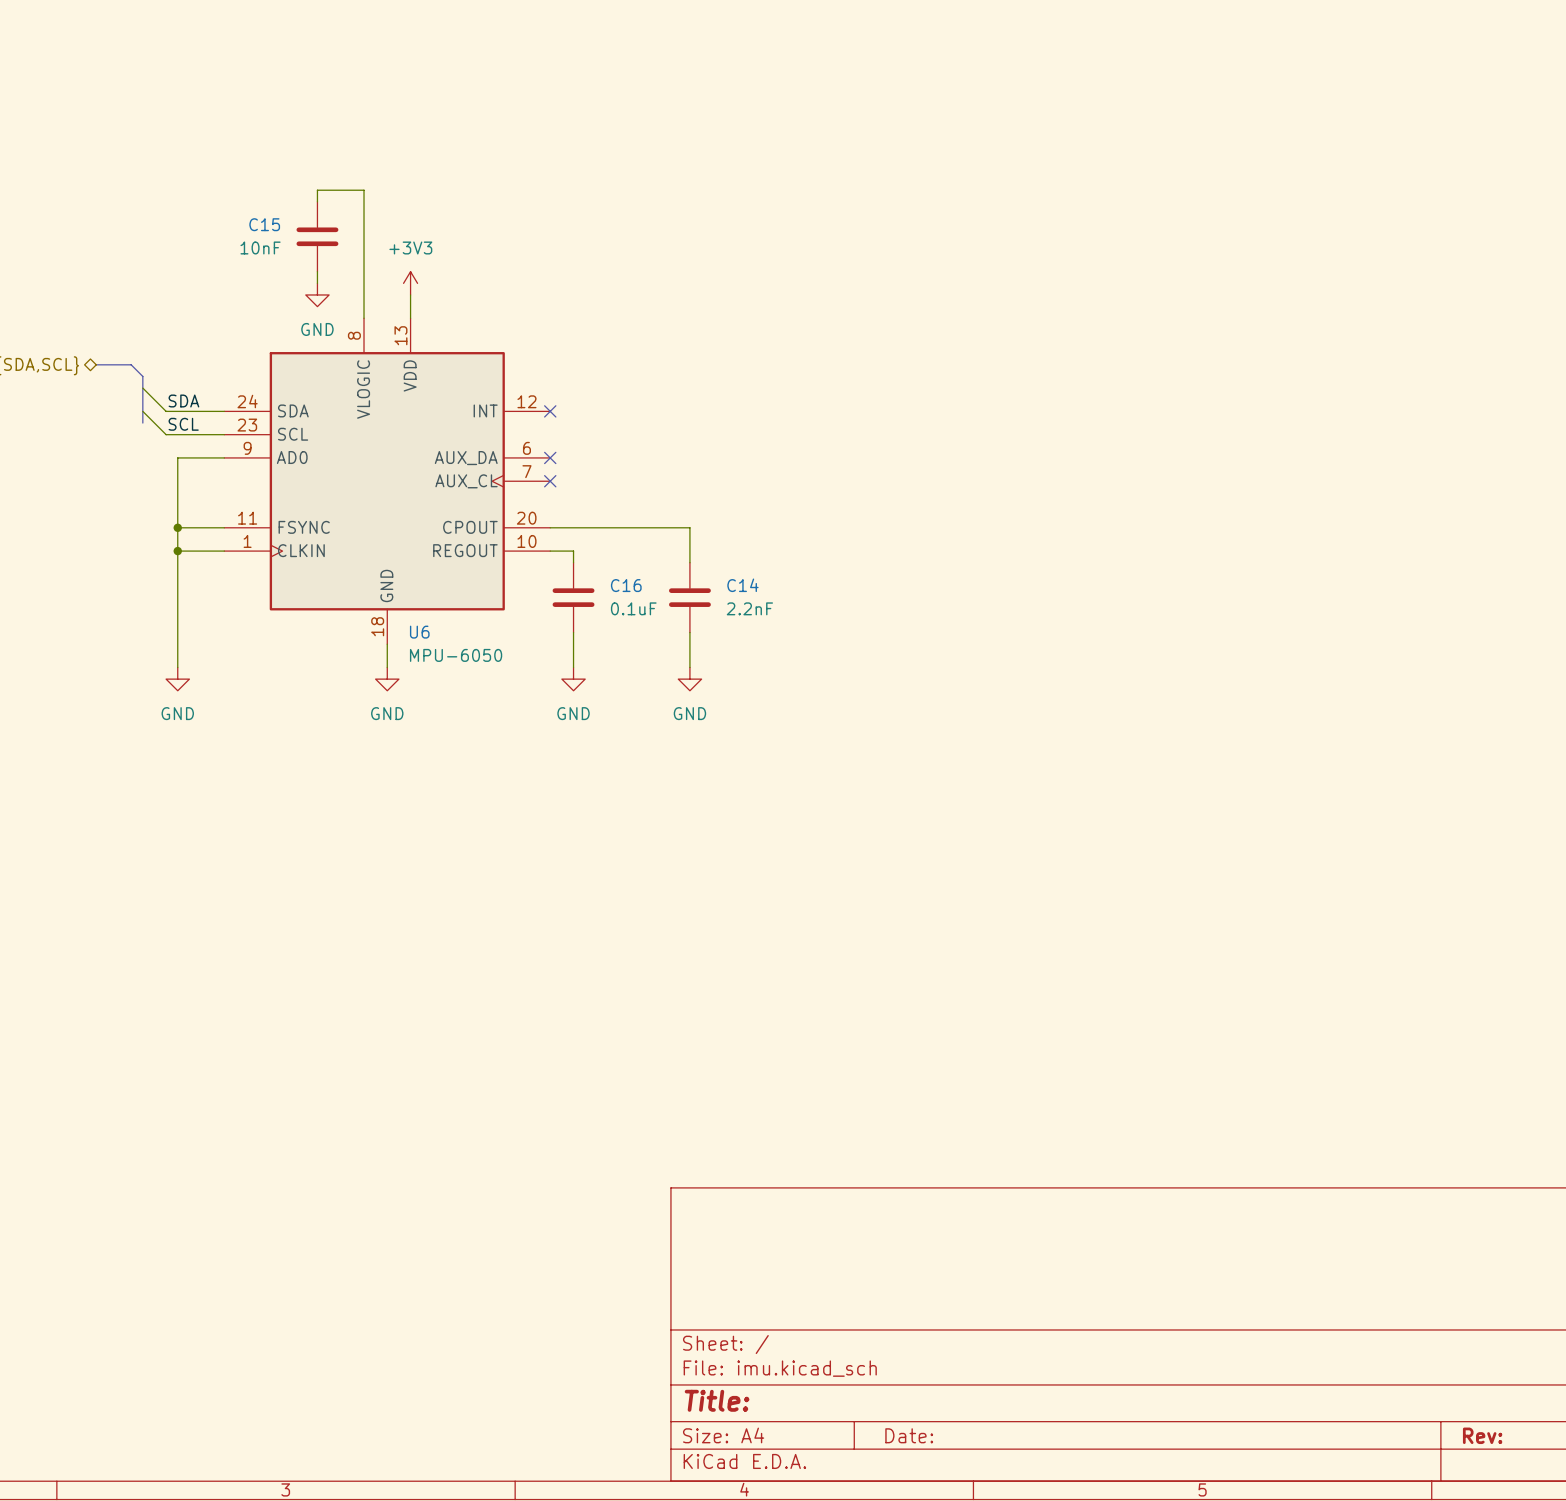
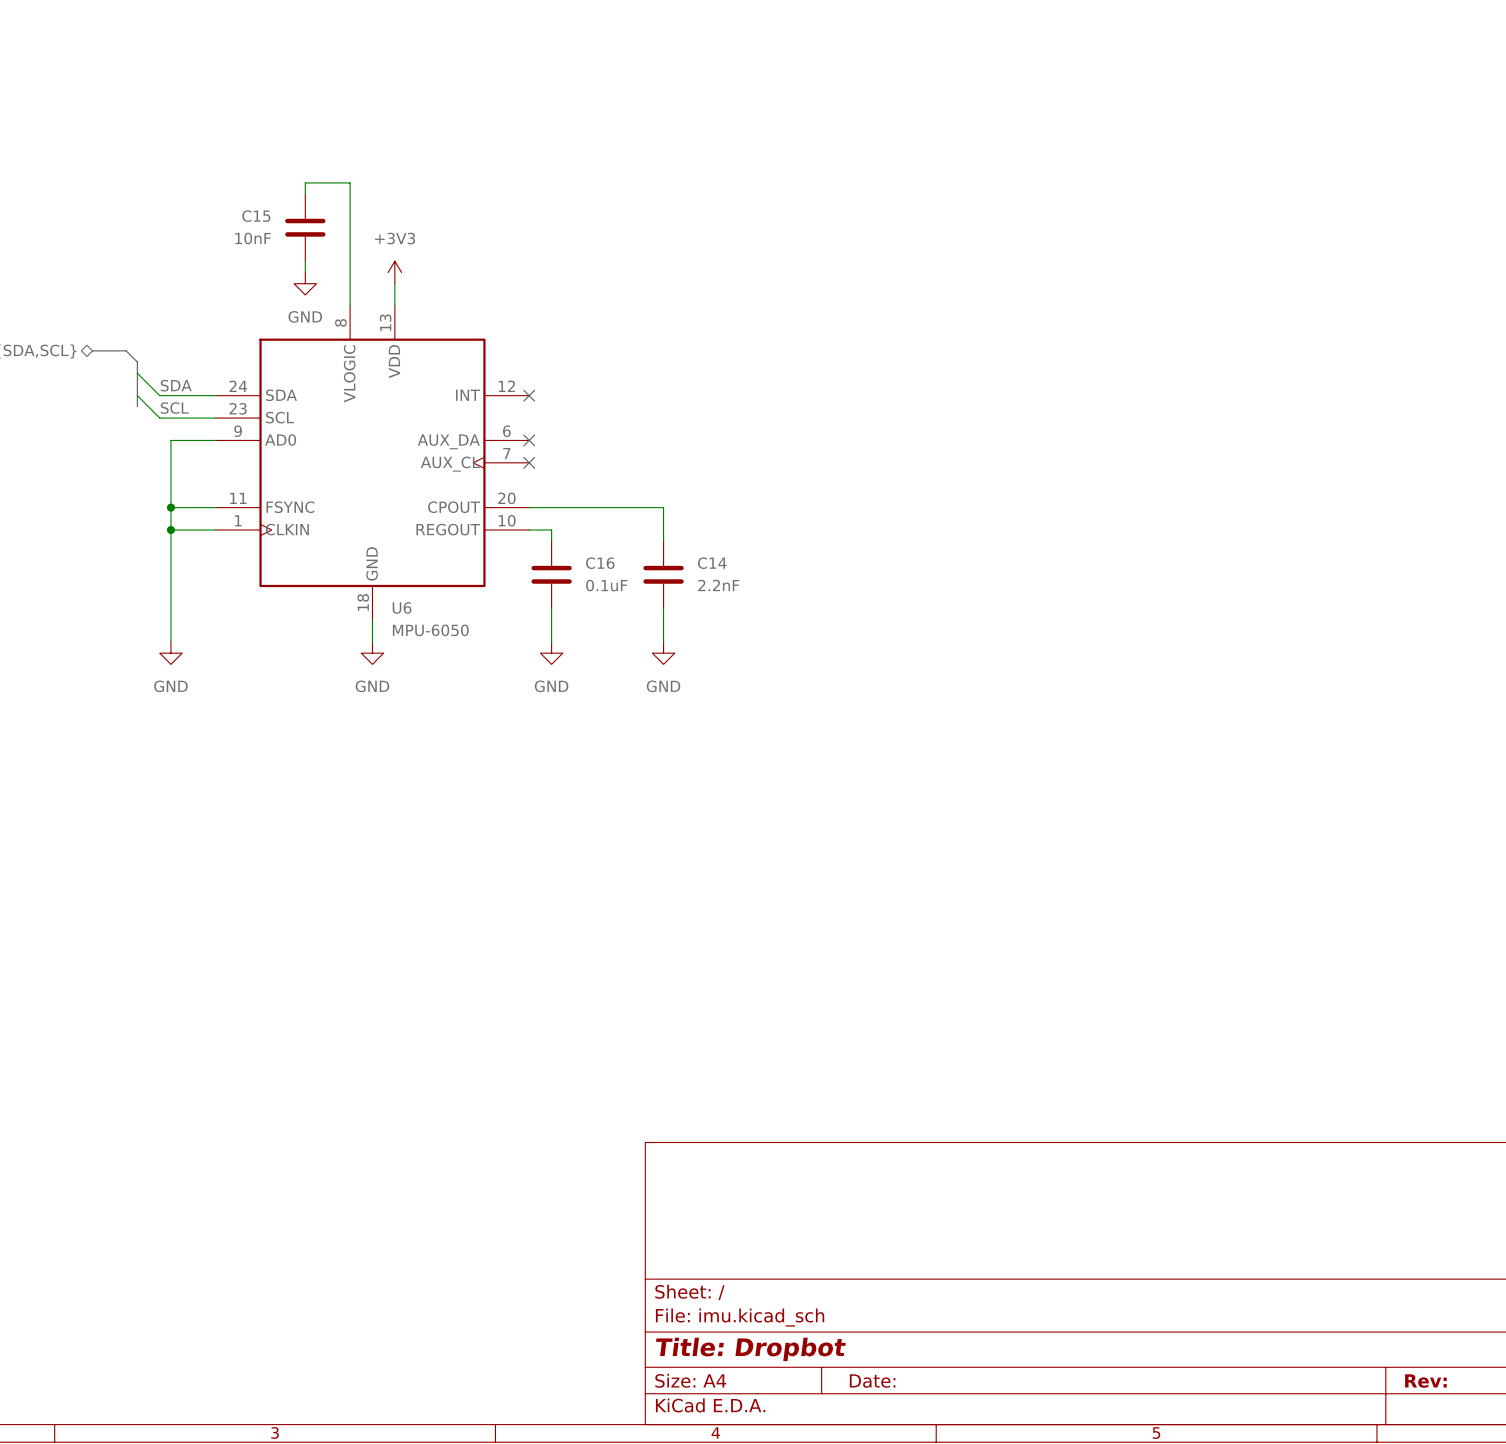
title block: Title: (717, 1400) -> Title: Dropbot (750, 1349)

